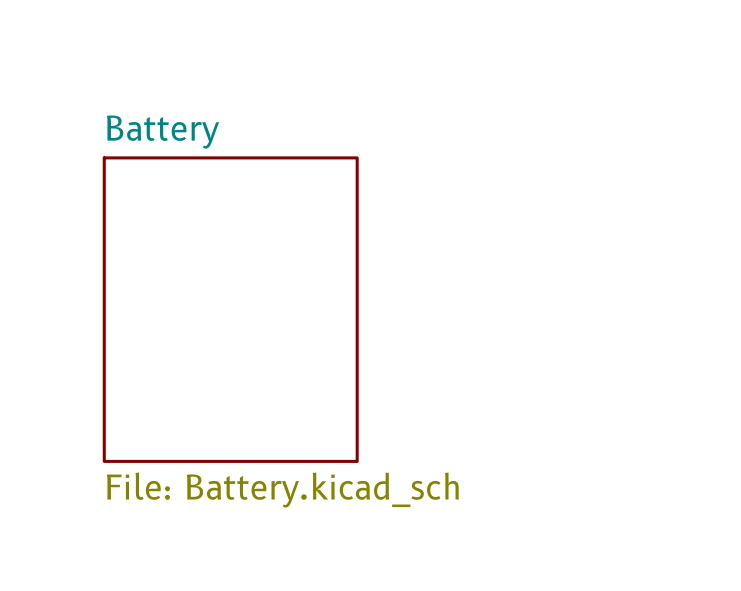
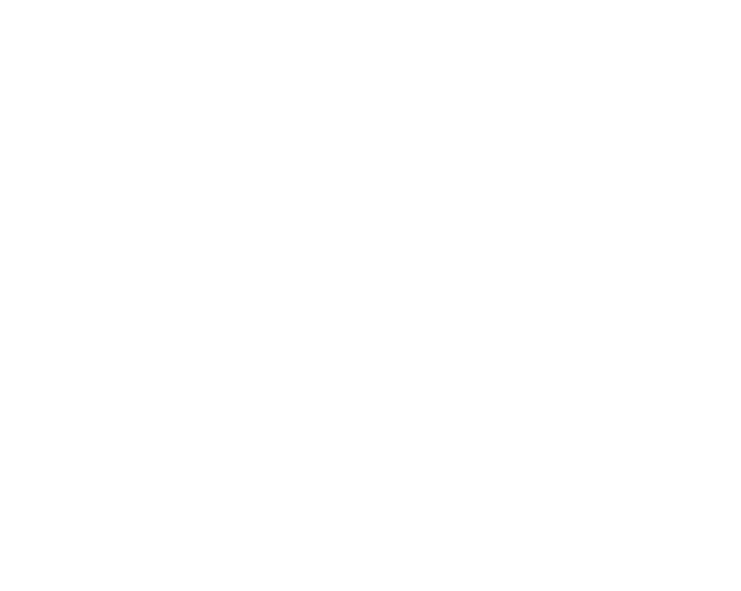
sheet Battery: File: Battery.kicad_sch (230, 309) -> none

